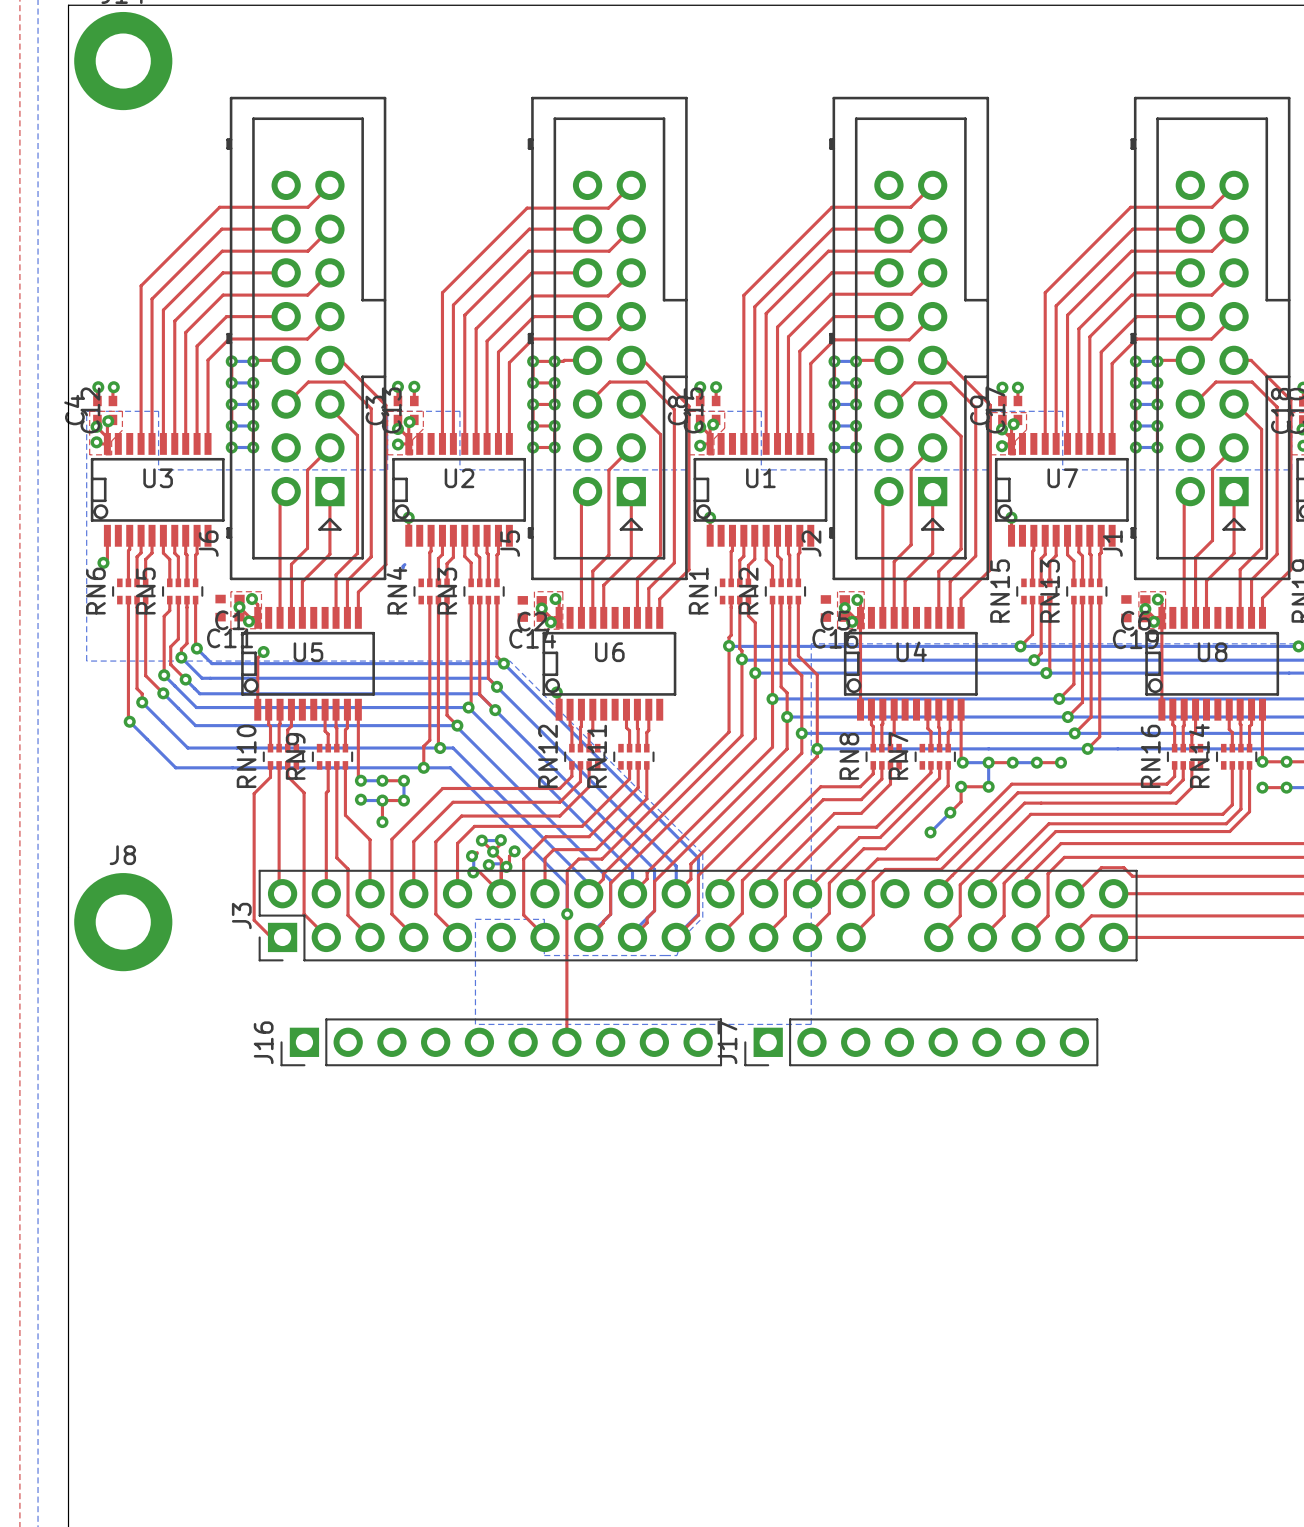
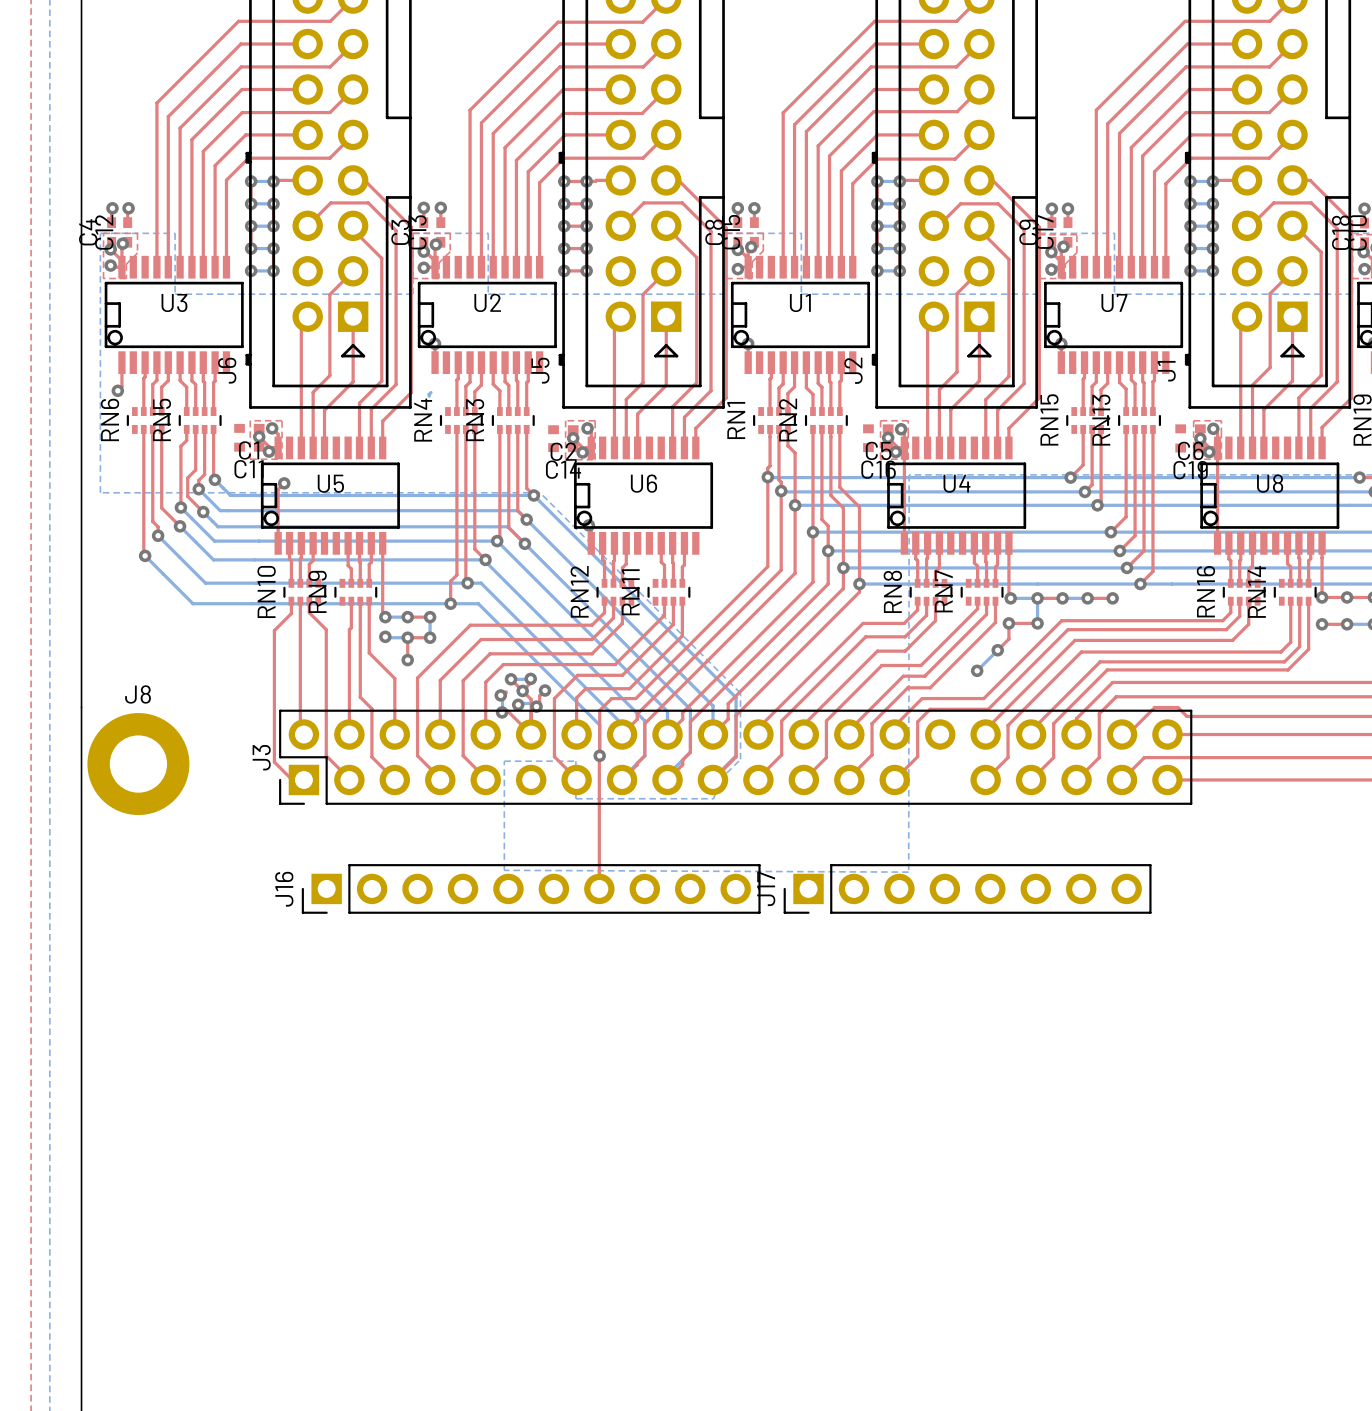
bottom zone outline: (865, 643) (811, 643) (811, 1024) (475, 1024) -> (909, 474) (908, 872) (504, 870)

